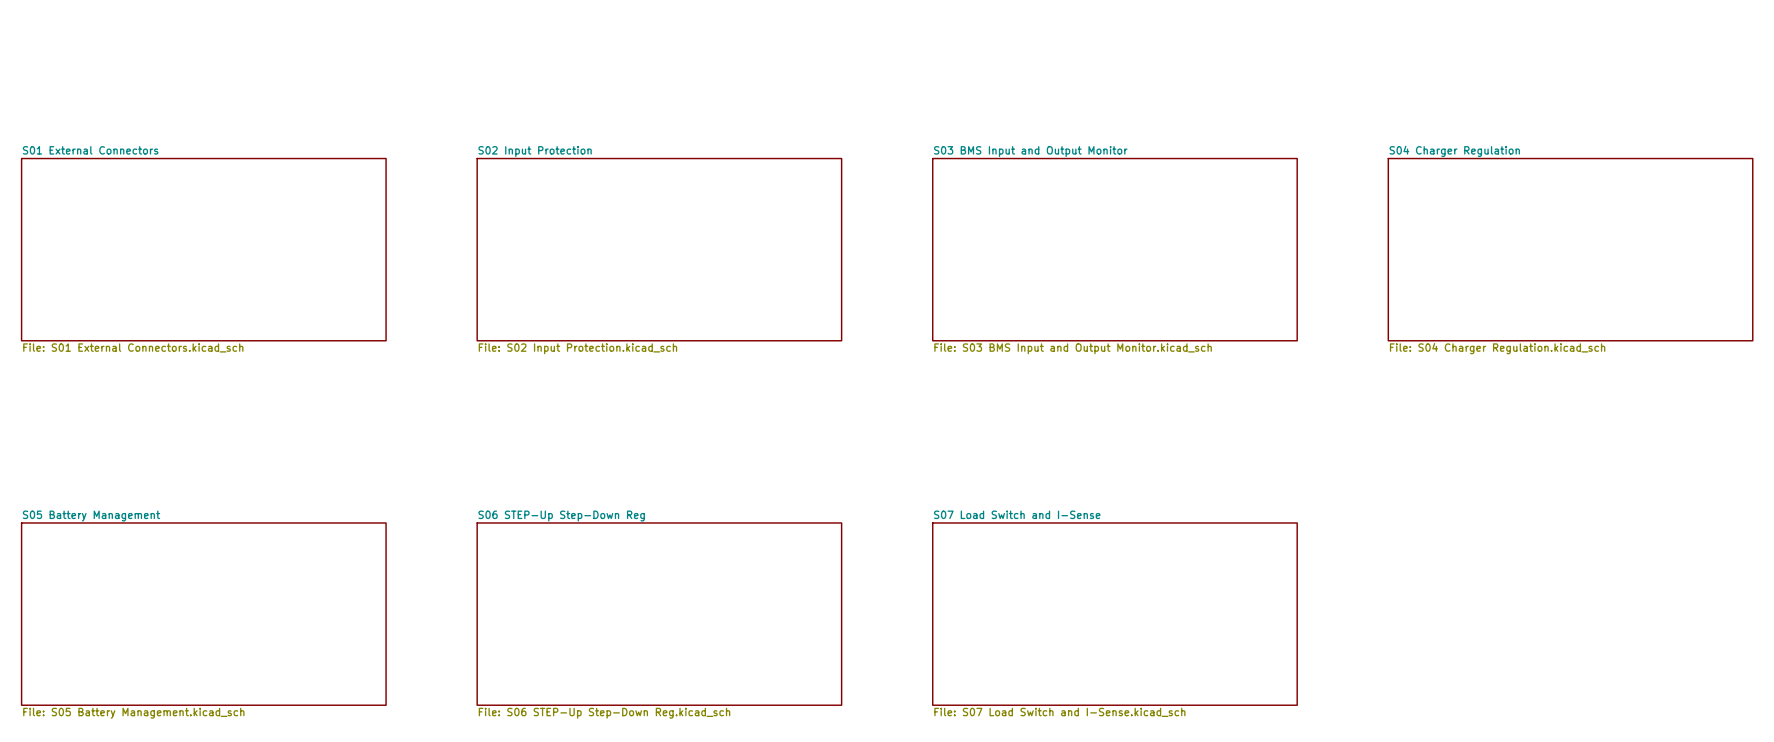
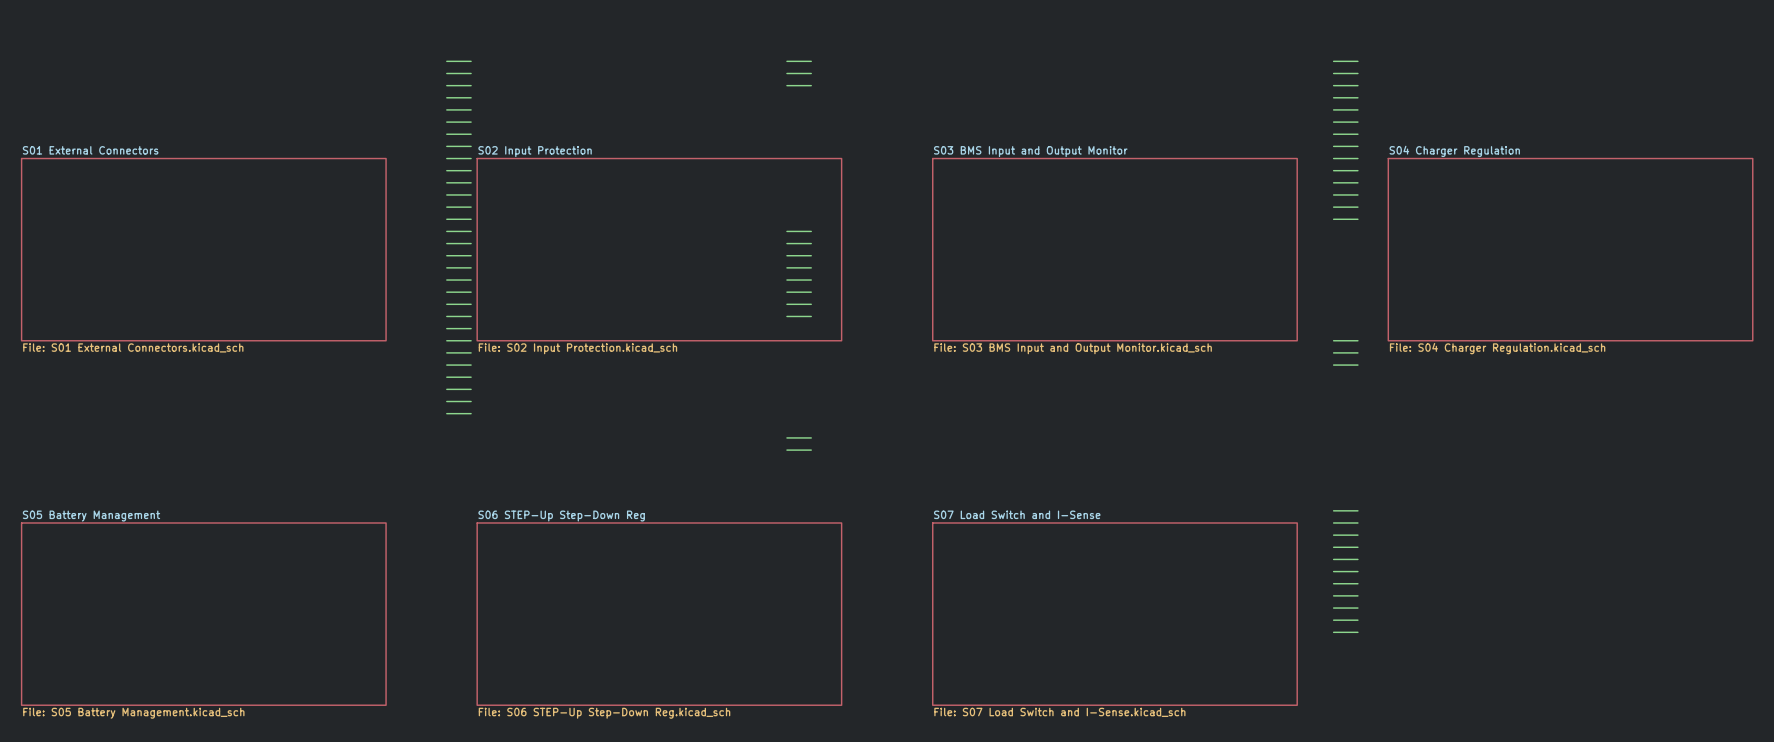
wire: none -> (446, 61) (471, 61)
wire: none -> (786, 61) (811, 61)
wire: none -> (1333, 61) (1357, 61)
wire: none -> (446, 73) (471, 73)
wire: none -> (786, 73) (811, 73)
wire: none -> (1333, 73) (1357, 73)
wire: none -> (446, 85) (471, 85)
wire: none -> (786, 85) (811, 85)
wire: none -> (1333, 85) (1357, 85)
wire: none -> (446, 97) (471, 97)
wire: none -> (1333, 97) (1357, 97)
wire: none -> (446, 109) (471, 109)
wire: none -> (1333, 109) (1357, 109)
wire: none -> (446, 122) (471, 122)
wire: none -> (1333, 122) (1357, 122)
wire: none -> (446, 134) (471, 134)
wire: none -> (1333, 134) (1357, 134)
wire: none -> (446, 146) (471, 146)
wire: none -> (1333, 146) (1357, 146)
wire: none -> (446, 158) (471, 158)
wire: none -> (1333, 158) (1357, 158)
wire: none -> (446, 170) (471, 170)
wire: none -> (1333, 170) (1357, 170)
wire: none -> (446, 182) (471, 182)
wire: none -> (1333, 182) (1357, 182)
wire: none -> (446, 194) (471, 194)
wire: none -> (1333, 194) (1357, 194)
wire: none -> (446, 207) (471, 207)
wire: none -> (1333, 207) (1357, 207)
wire: none -> (446, 219) (471, 219)
wire: none -> (1333, 219) (1357, 219)
wire: none -> (446, 231) (471, 231)
wire: none -> (786, 231) (811, 231)
wire: none -> (446, 243) (471, 243)
wire: none -> (786, 243) (811, 243)
wire: none -> (446, 255) (471, 255)
wire: none -> (786, 255) (811, 255)
wire: none -> (446, 267) (471, 267)
wire: none -> (786, 267) (811, 267)
wire: none -> (446, 280) (471, 280)
wire: none -> (786, 280) (811, 280)
wire: none -> (446, 292) (471, 292)
wire: none -> (786, 292) (811, 292)
wire: none -> (446, 304) (471, 304)
wire: none -> (786, 304) (811, 304)
wire: none -> (446, 316) (471, 316)
wire: none -> (786, 316) (811, 316)
wire: none -> (446, 328) (471, 328)
wire: none -> (446, 340) (471, 340)
wire: none -> (1333, 340) (1357, 340)
wire: none -> (446, 352) (471, 352)
wire: none -> (1333, 352) (1357, 352)
wire: none -> (446, 365) (471, 365)
wire: none -> (1333, 365) (1357, 365)
wire: none -> (446, 377) (471, 377)
wire: none -> (446, 389) (471, 389)
wire: none -> (446, 401) (471, 401)
wire: none -> (446, 413) (471, 413)
wire: none -> (786, 437) (811, 437)
wire: none -> (786, 450) (811, 450)
wire: none -> (1333, 510) (1357, 510)
wire: none -> (1333, 522) (1357, 522)
wire: none -> (1333, 535) (1357, 535)
wire: none -> (1333, 547) (1357, 547)
wire: none -> (1333, 559) (1357, 559)
wire: none -> (1333, 571) (1357, 571)
wire: none -> (1333, 583) (1357, 583)
wire: none -> (1333, 595) (1357, 595)
wire: none -> (1333, 608) (1357, 608)
wire: none -> (1333, 620) (1357, 620)
wire: none -> (1333, 632) (1357, 632)

